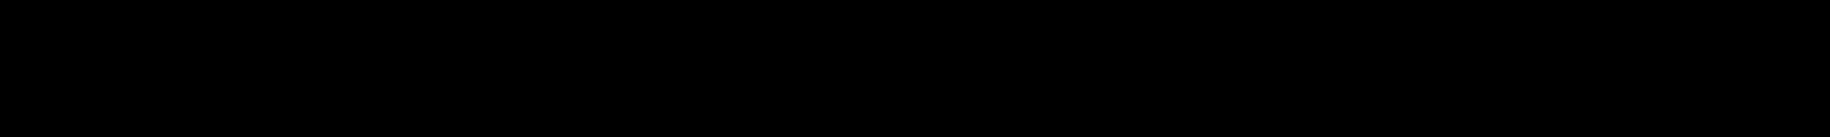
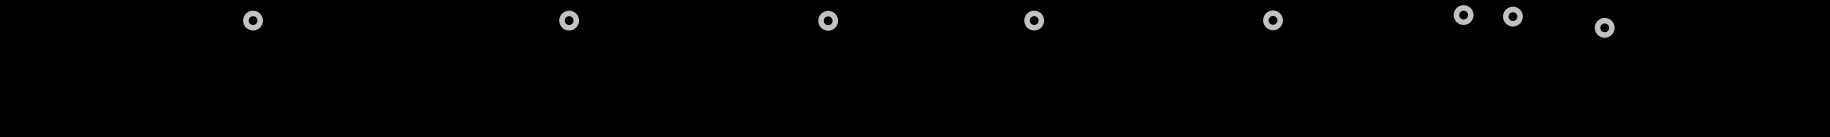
via: none -> (1463, 15)
via: none -> (1512, 16)
via: none -> (253, 20)
via: none -> (569, 20)
via: none -> (828, 20)
via: none -> (1034, 20)
via: none -> (1273, 20)
via: none -> (1604, 27)

